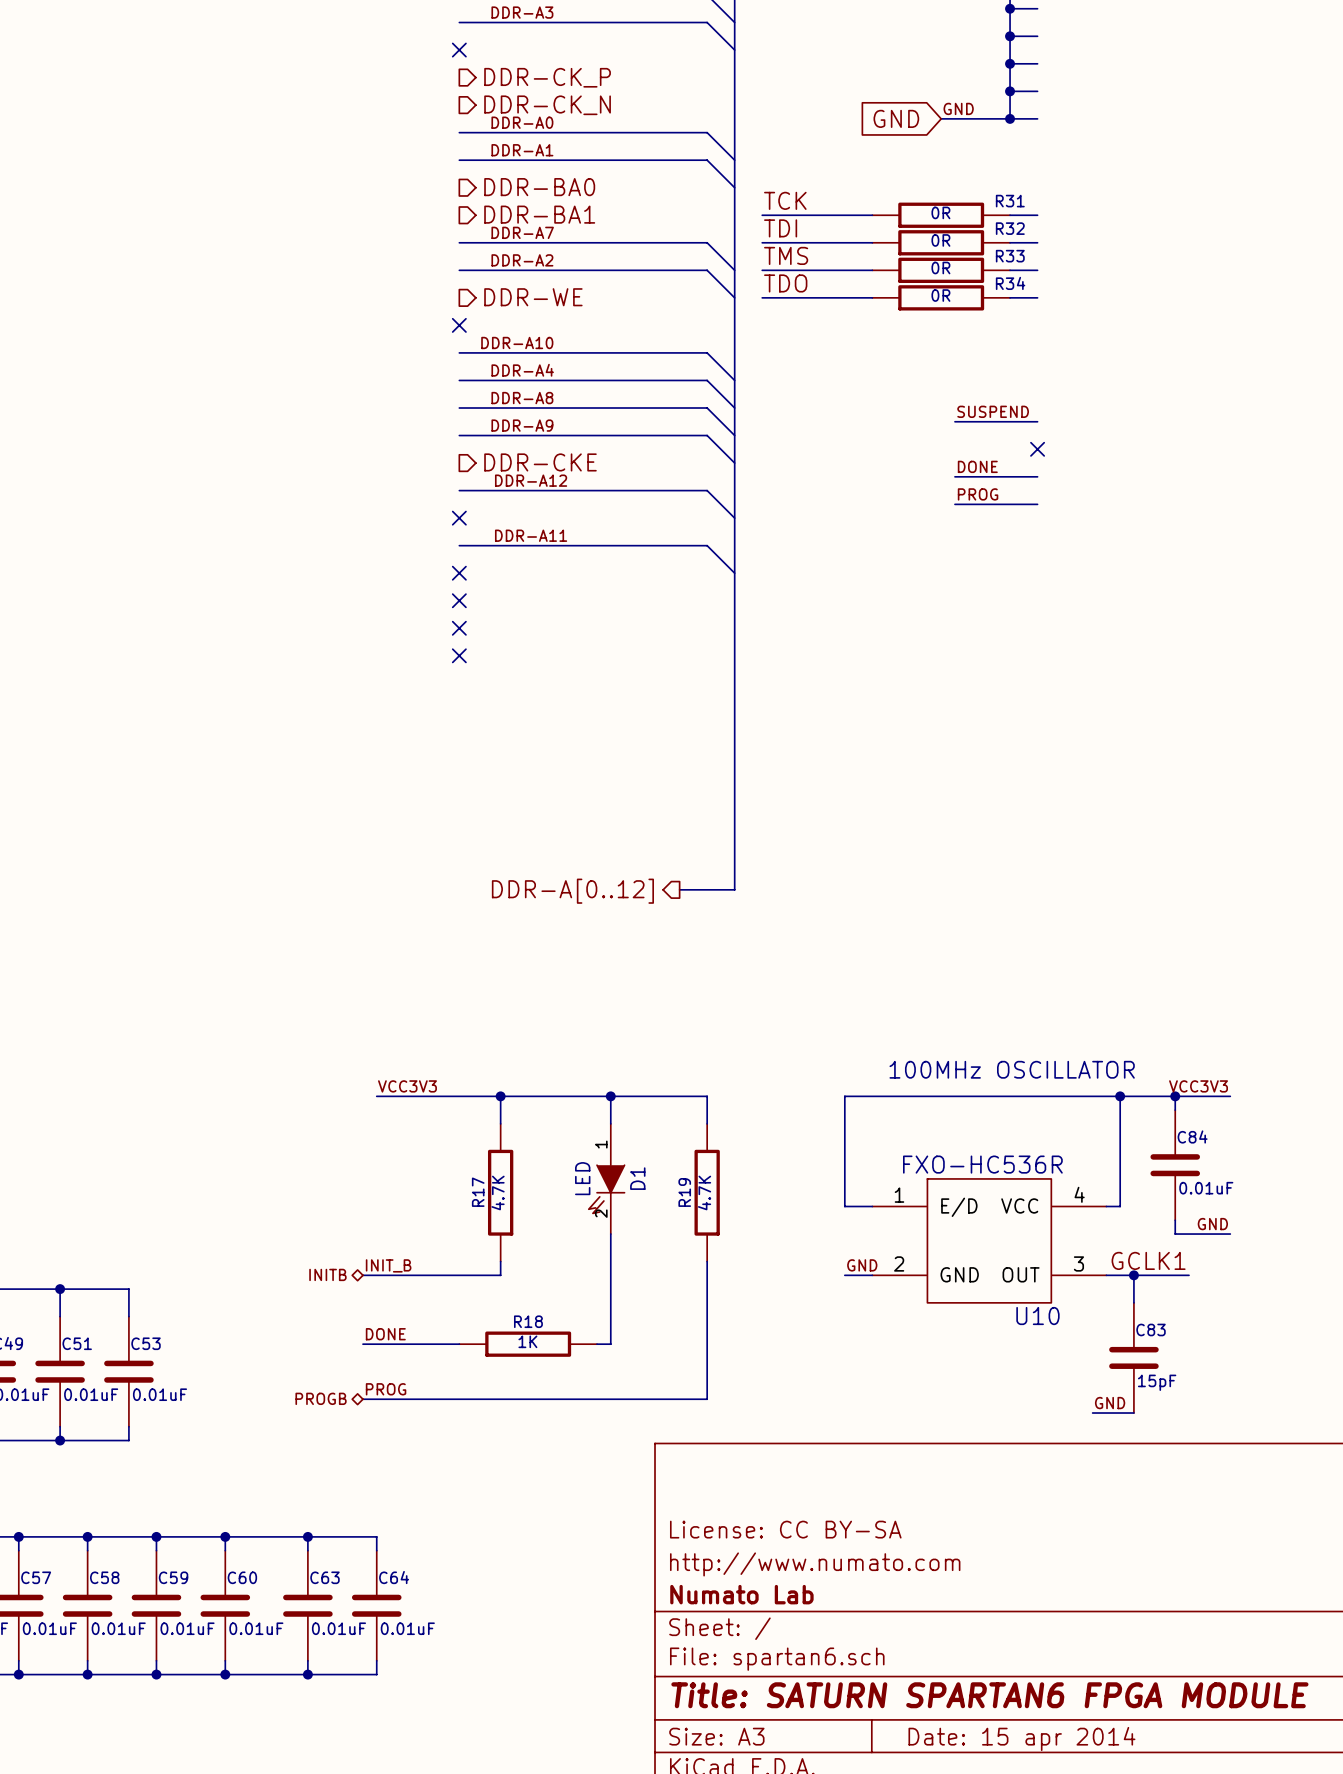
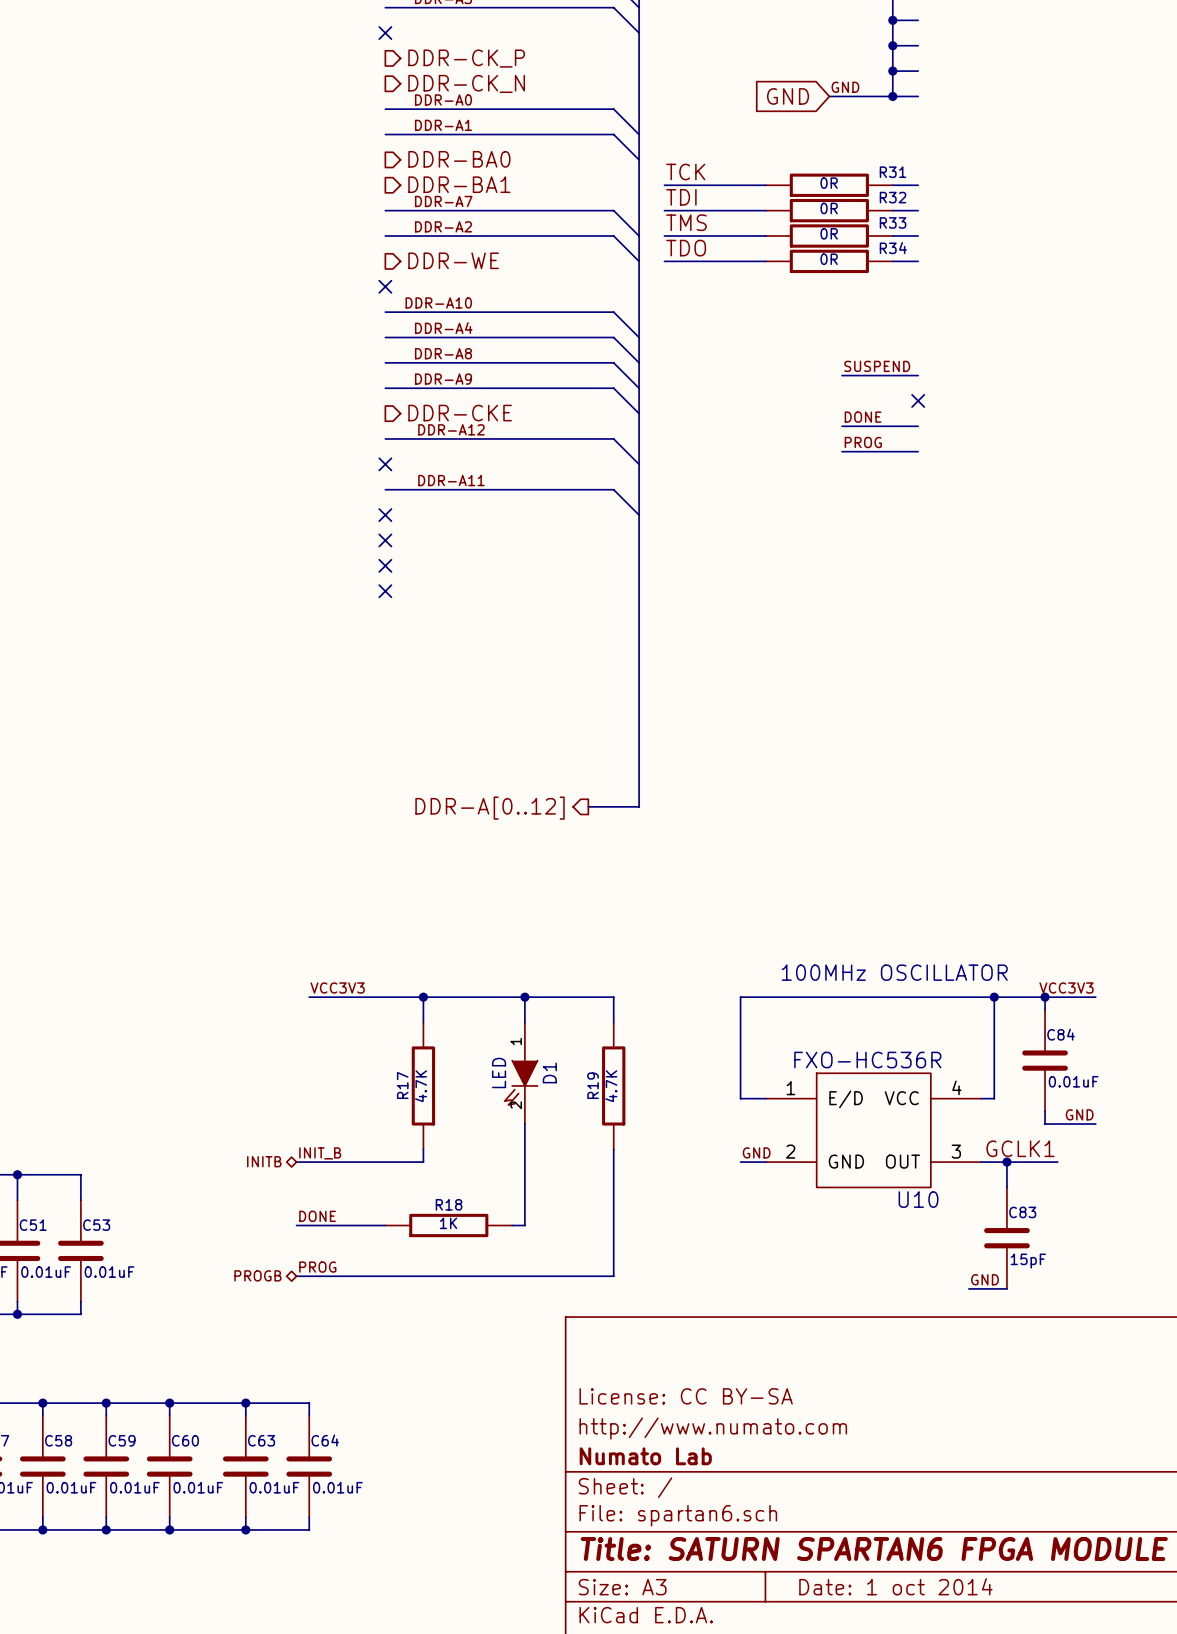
title block: Date: 15 apr 2014 (1021, 1738) -> Date: 1 oct 2014 (895, 1586)

